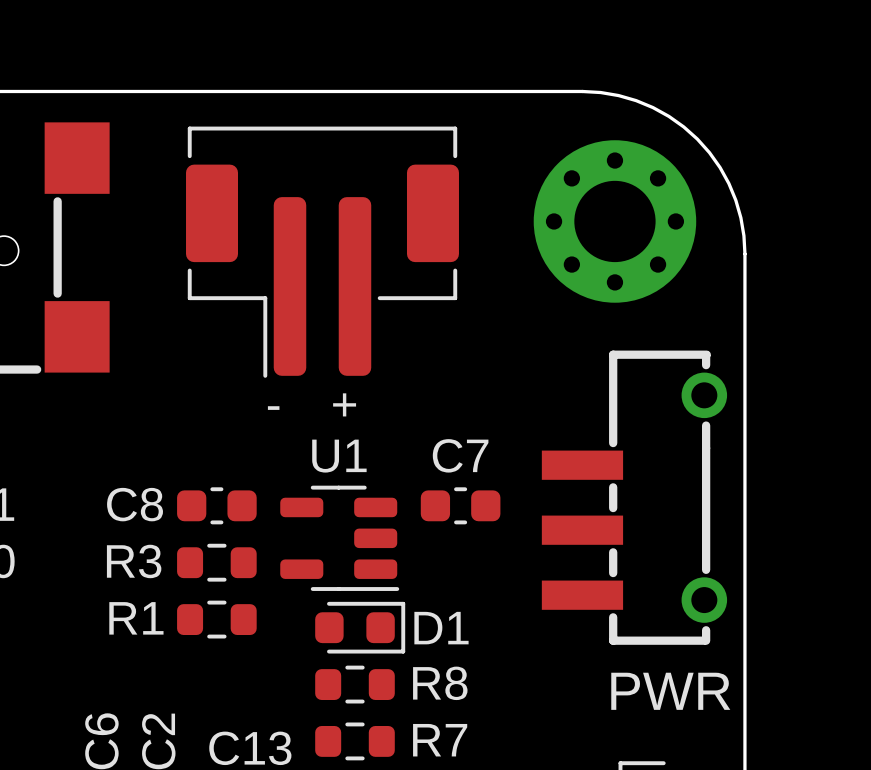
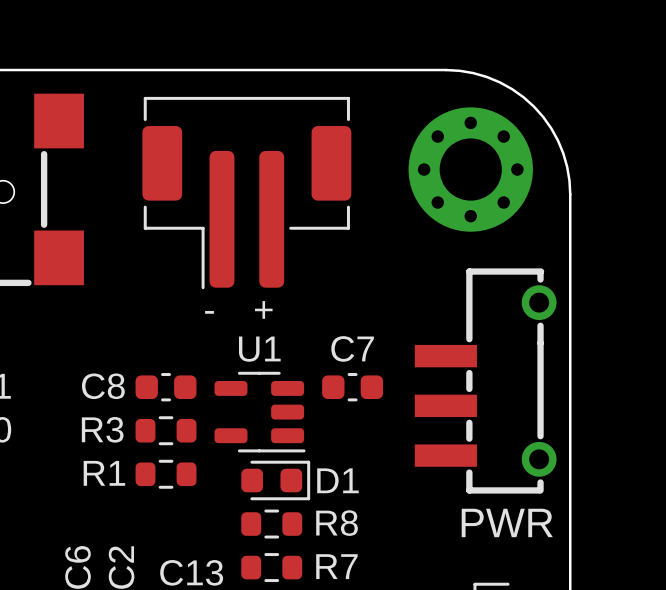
PWR name: none -> PWR (507, 522)
PWR value: PWR (670, 691) -> none

